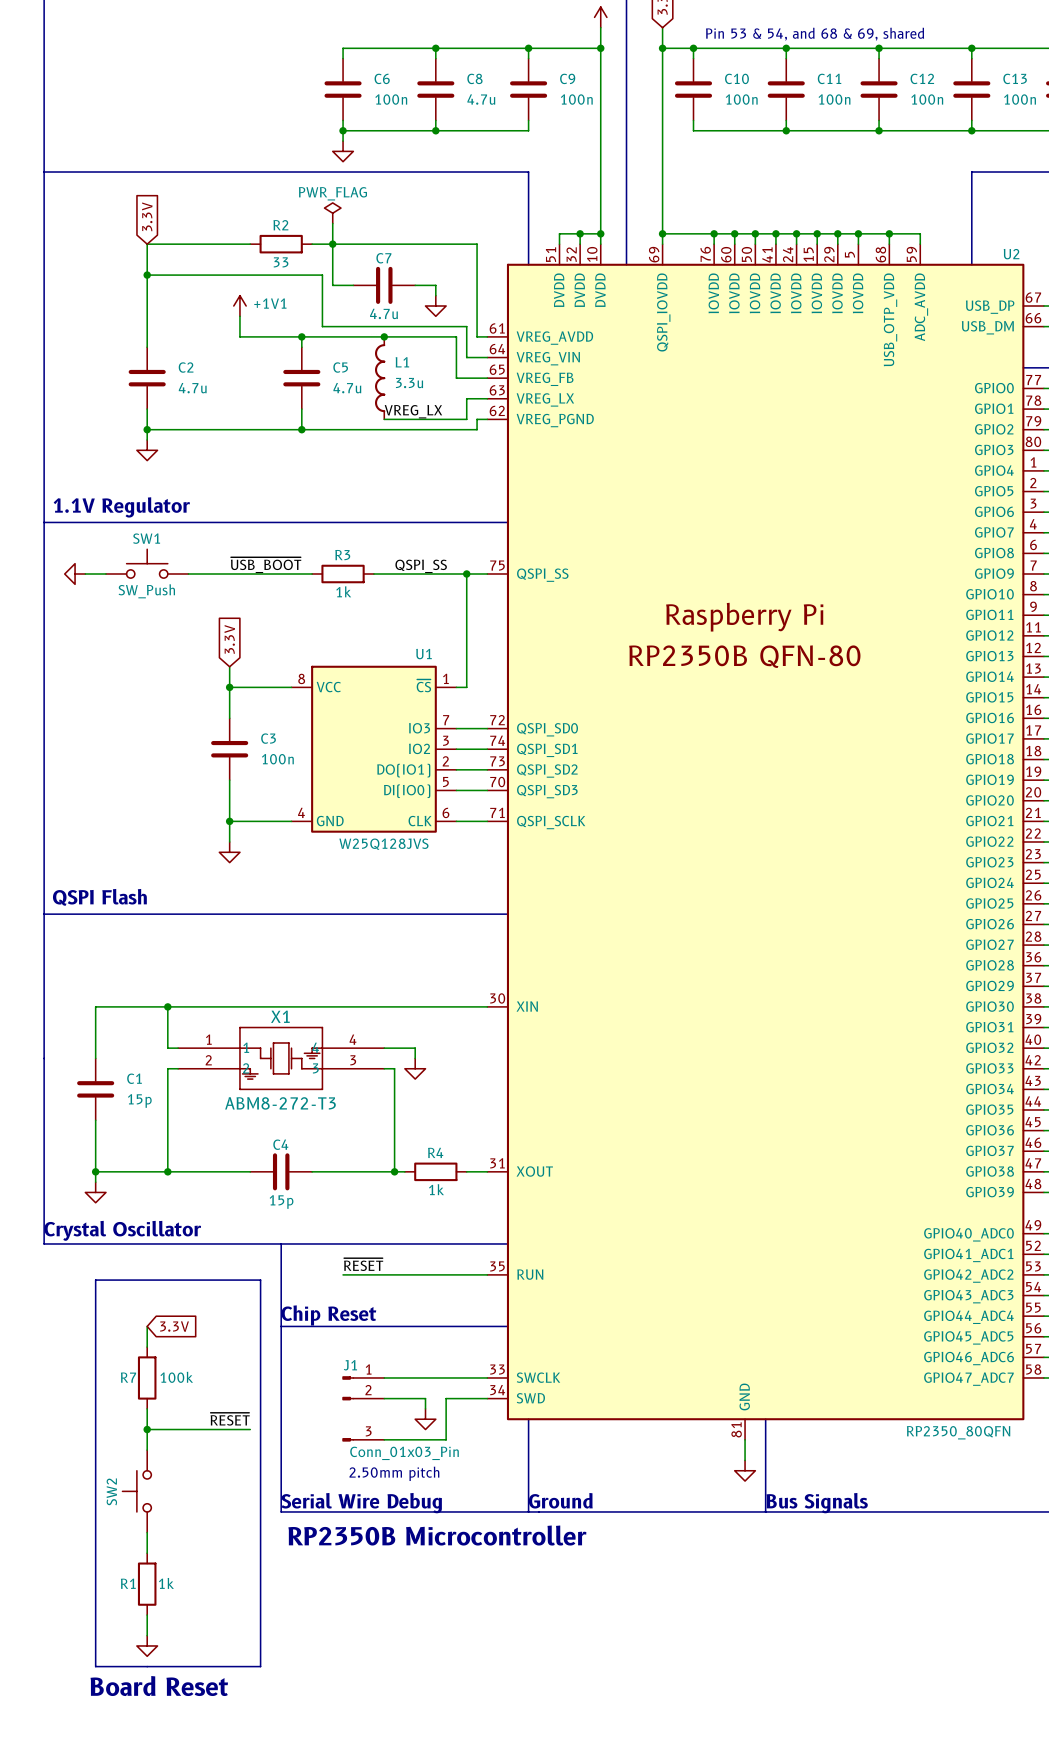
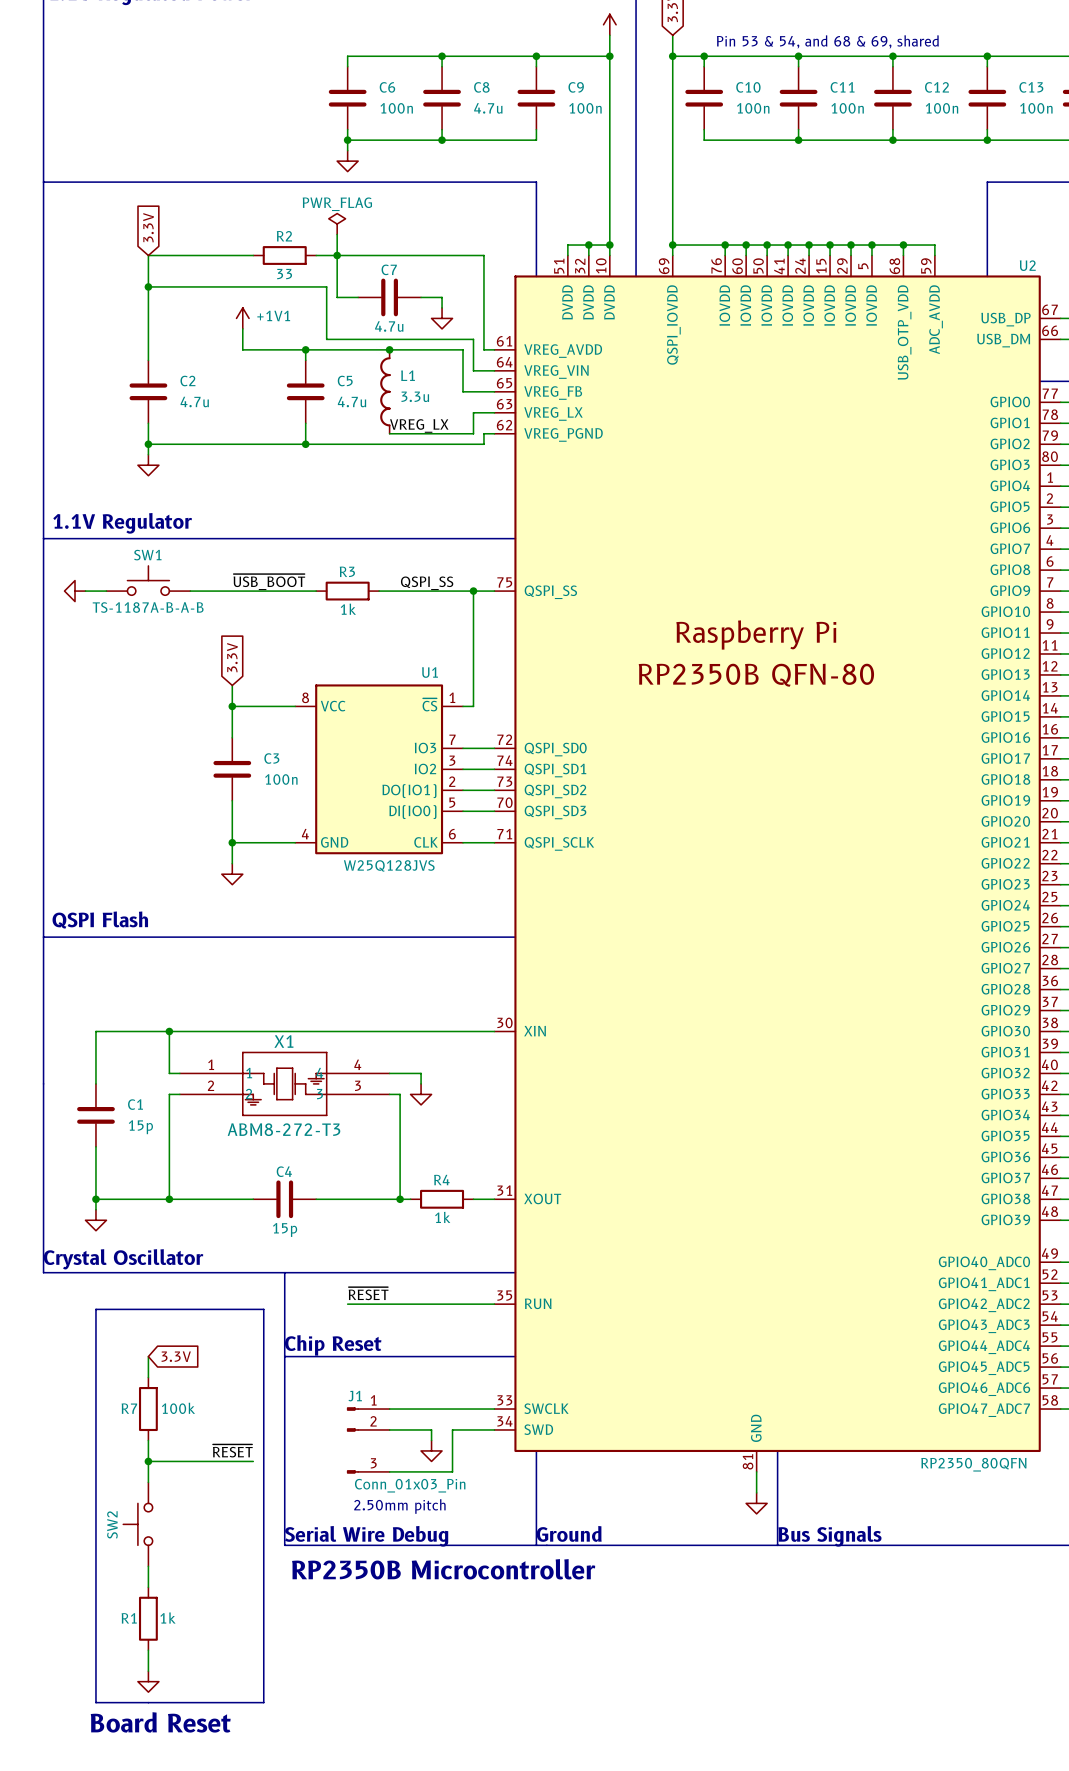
SW1 value: SW_Push (146, 591) -> TS-1187A-B-A-B (148, 607)

